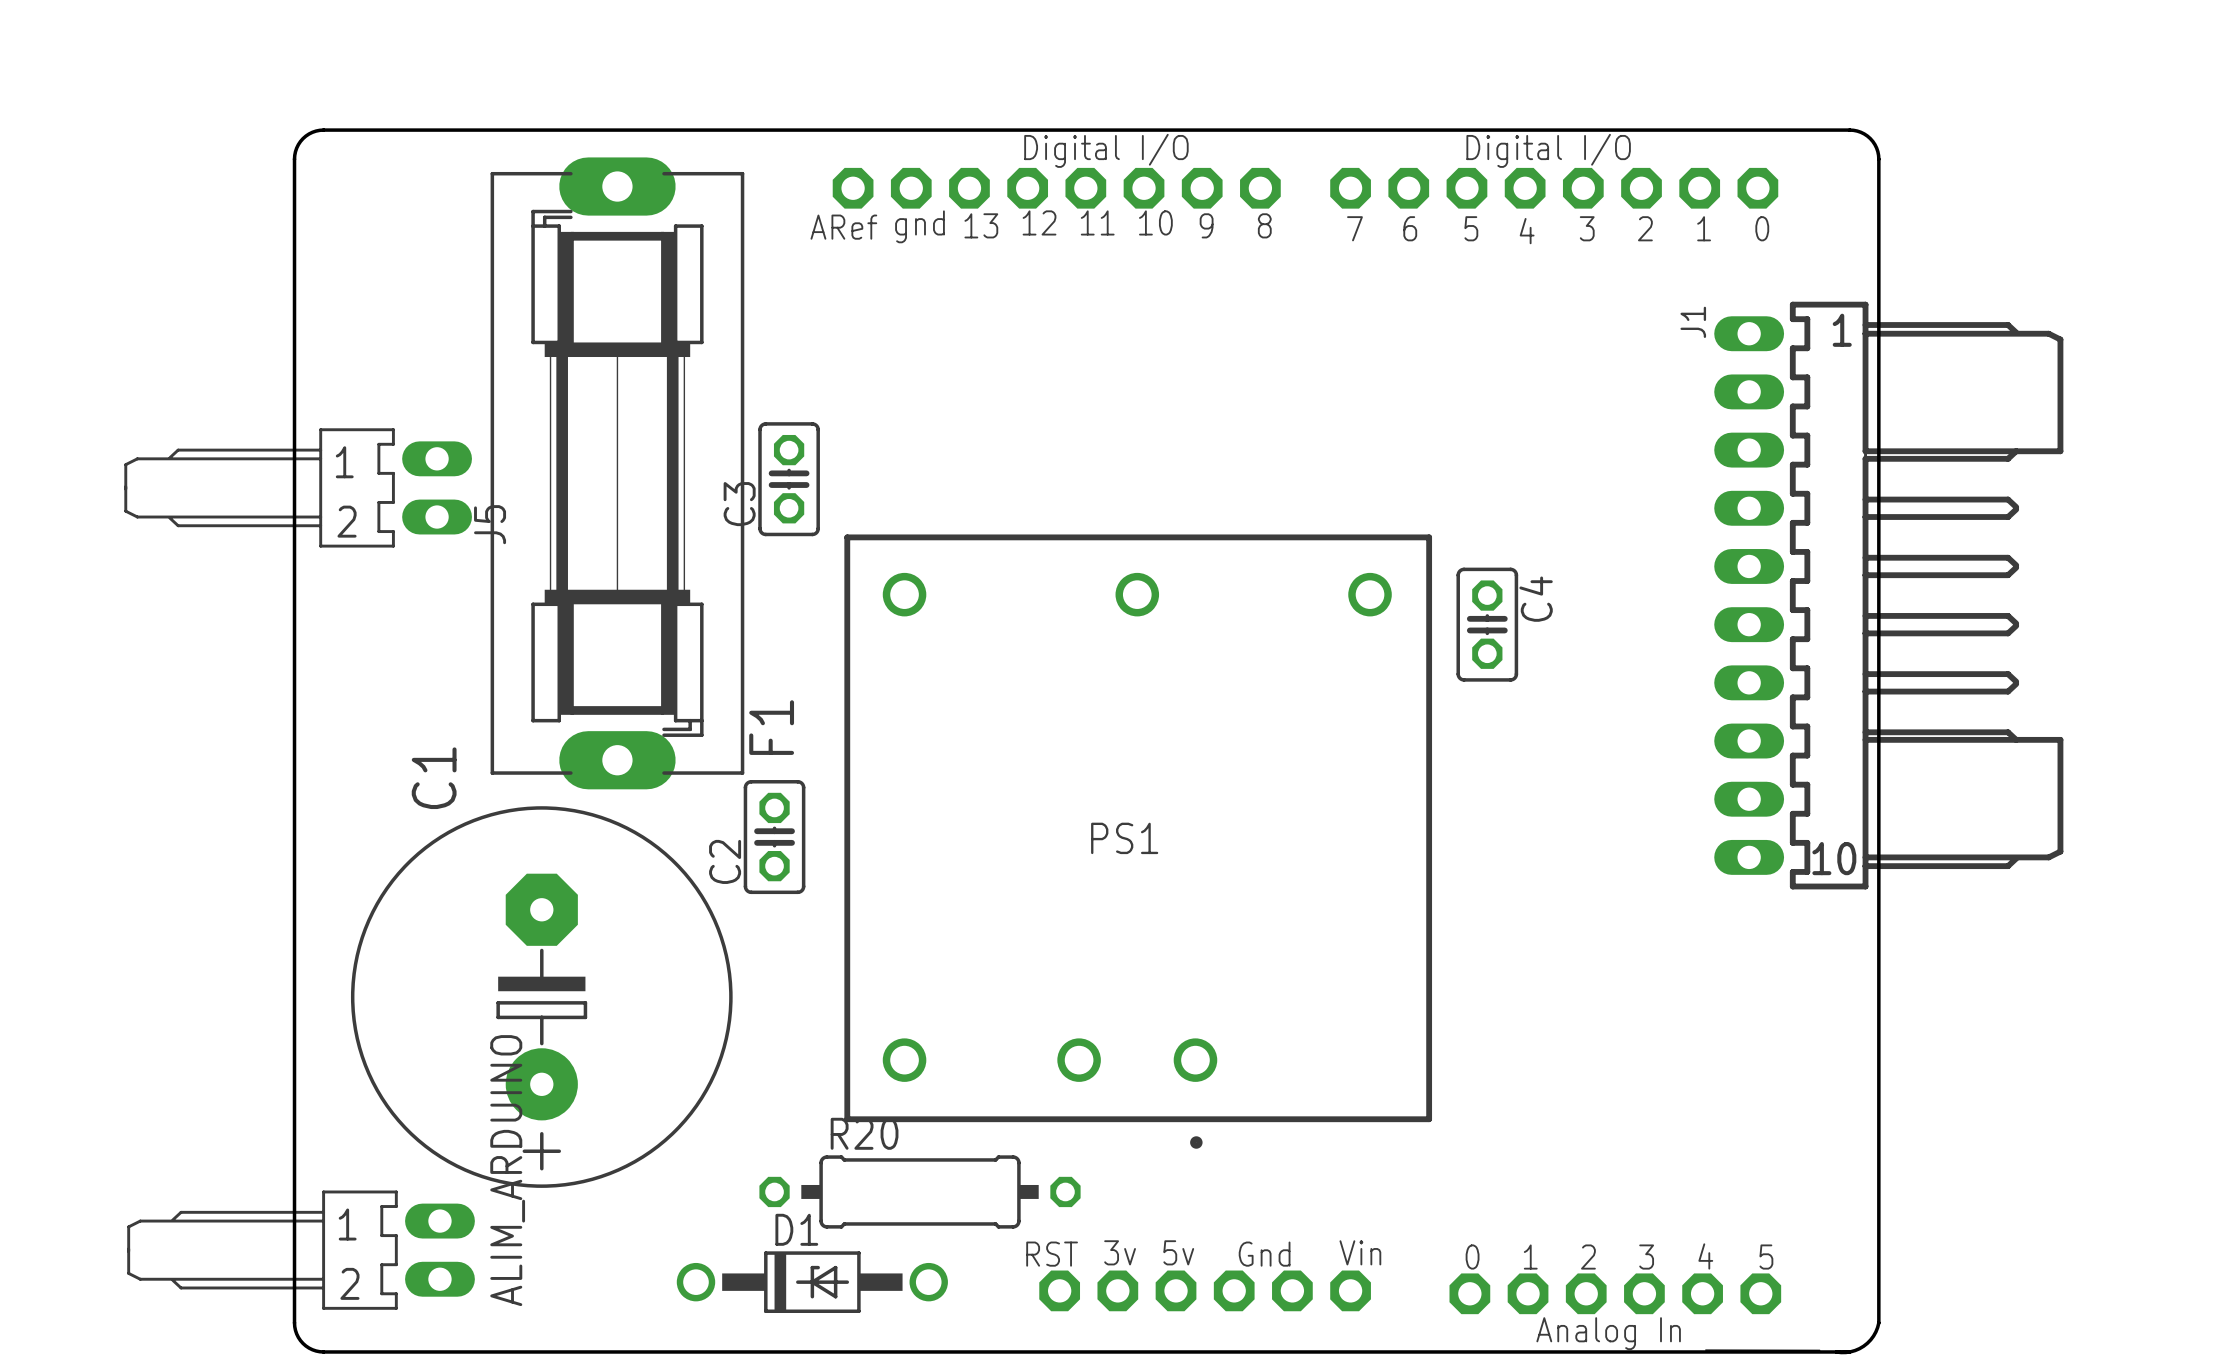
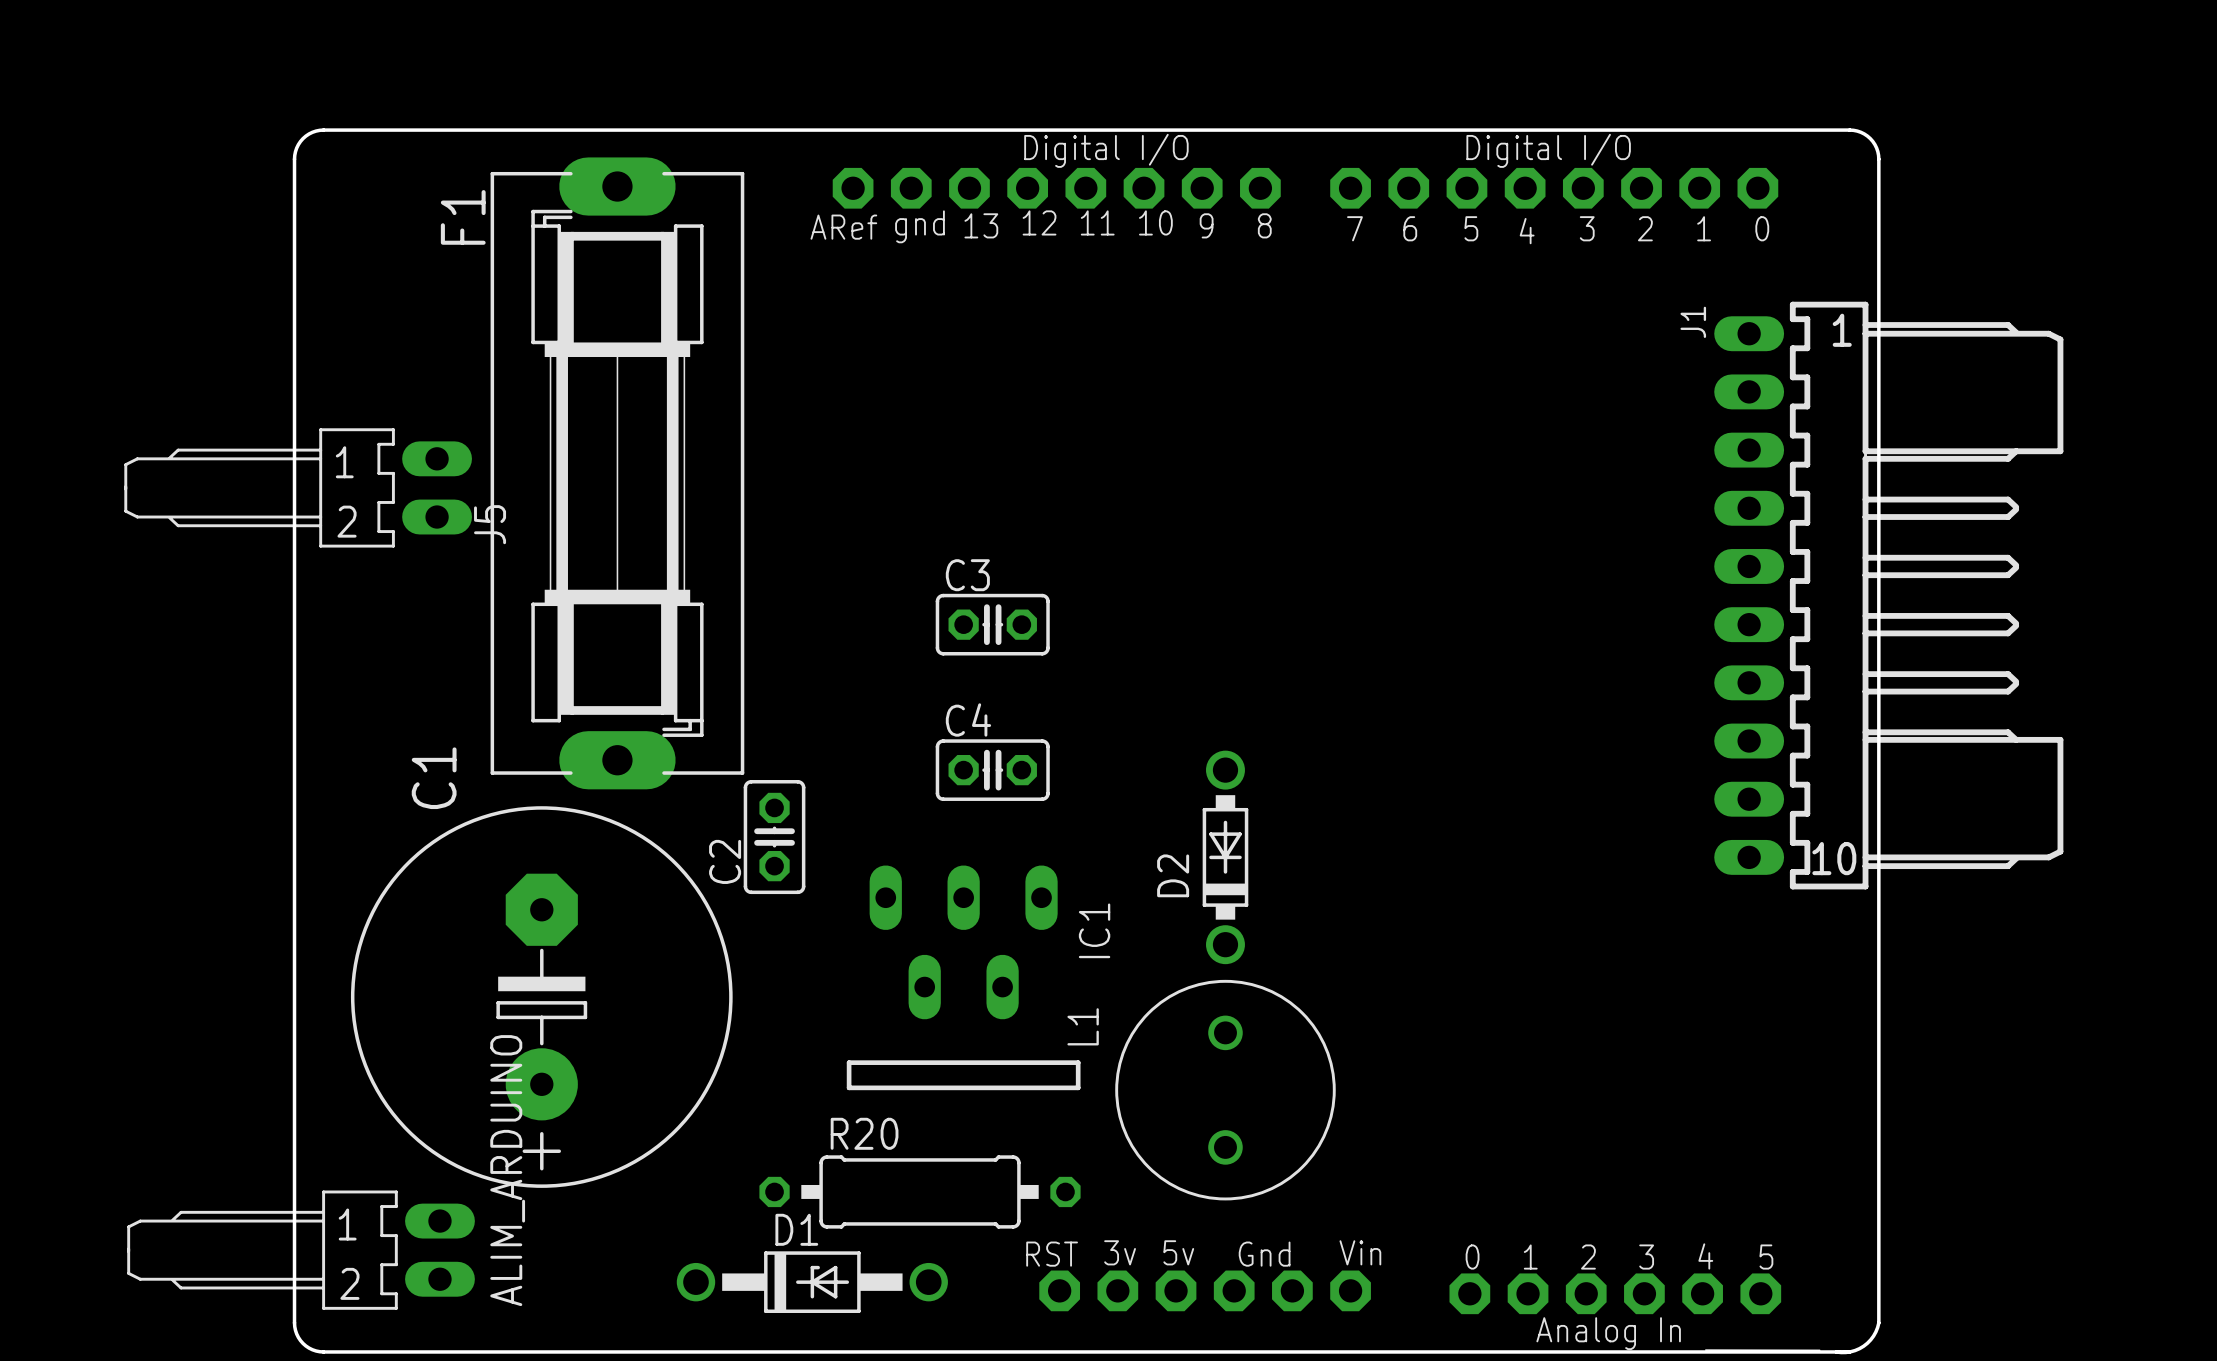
C3 rotation: 0° (789, 479) -> 90° clockwise (992, 624)
C3 position: (789, 479) -> (992, 624)
C4 name position: C4 (1536, 599) -> C4 (968, 719)
C4 rotation: 0° (1487, 624) -> 90° clockwise (992, 770)
C4 position: (1487, 624) -> (992, 770)
F1 name position: F1 (771, 727) -> F1 (463, 217)
PS1: (1138, 841) -> none
D2: none -> (1225, 857)
IC1: none -> (963, 977)
L1: none -> (1225, 1090)

